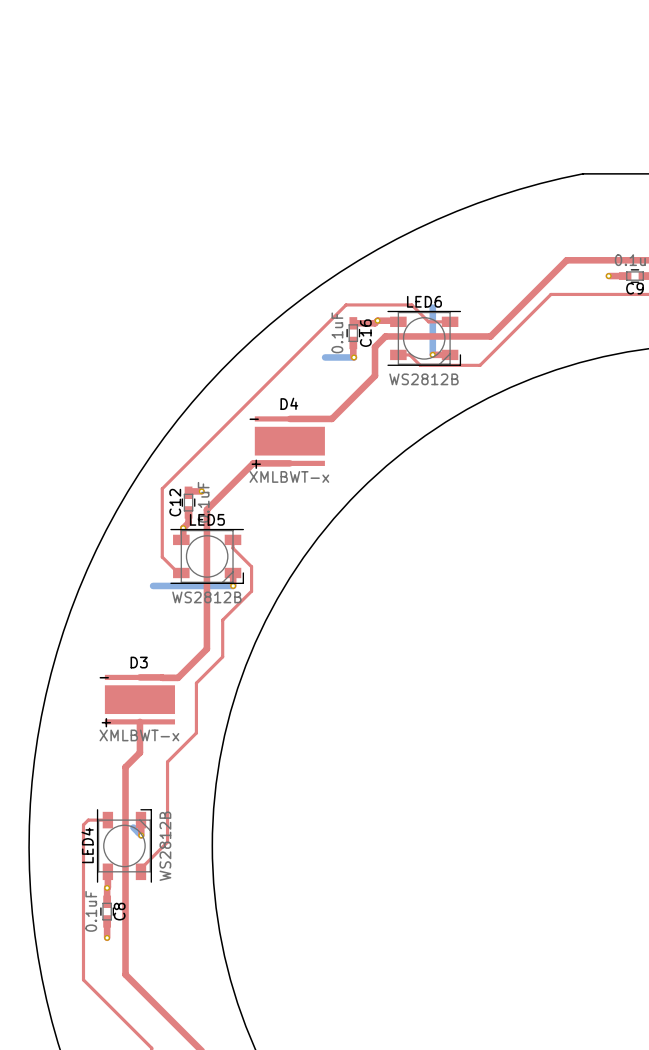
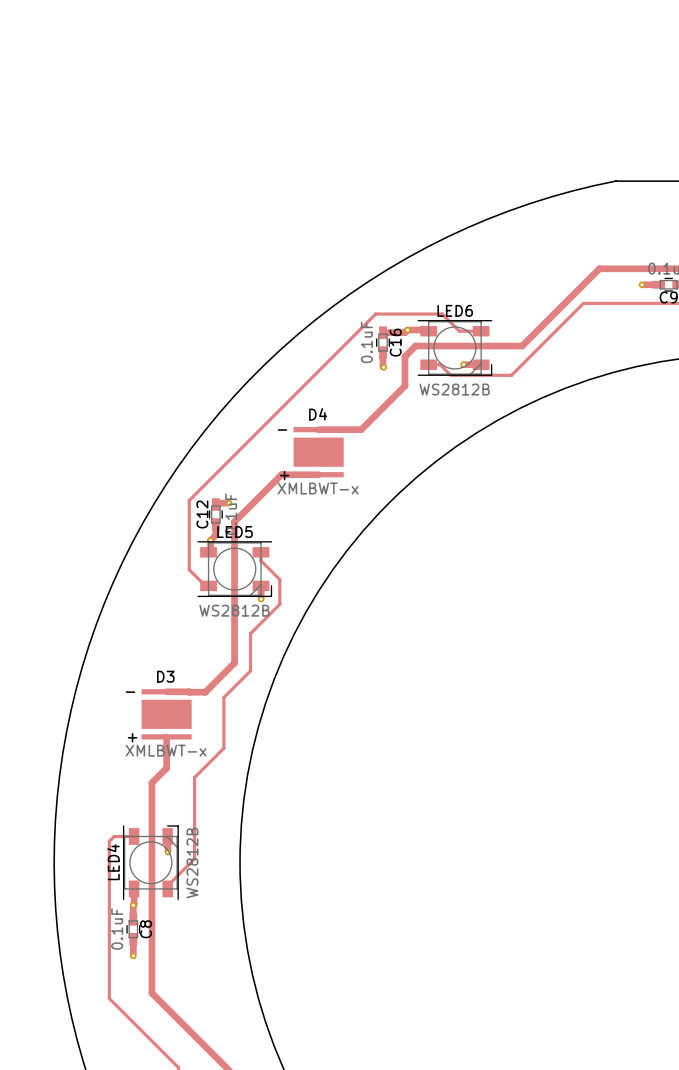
bottom track: (432, 307) (432, 354) -> none
bottom track: (325, 357) (354, 357) -> none
D4 footprint: [254, 416, 325, 466] -> [293, 427, 344, 478]
bottom track: (153, 585) (233, 585) -> none
D3 footprint: [104, 674, 176, 725] -> [141, 689, 192, 740]
bottom track: (133, 827) (141, 835) -> none

